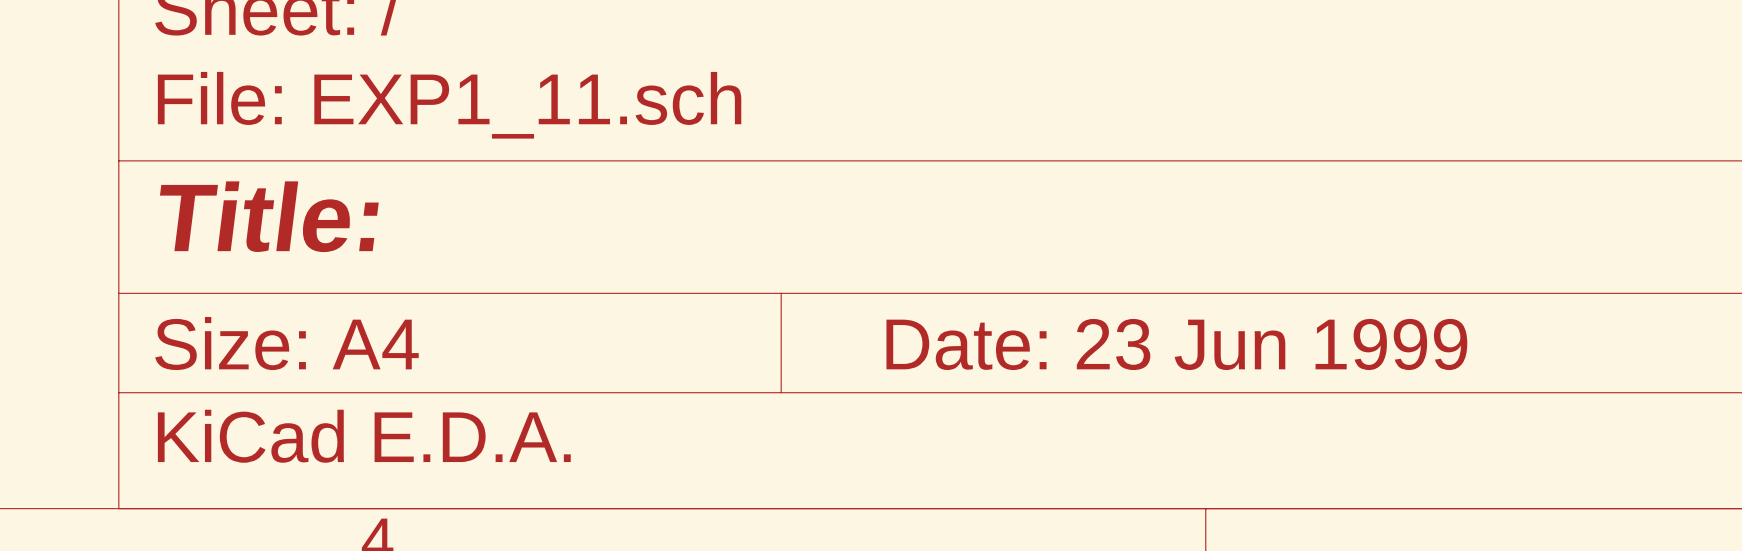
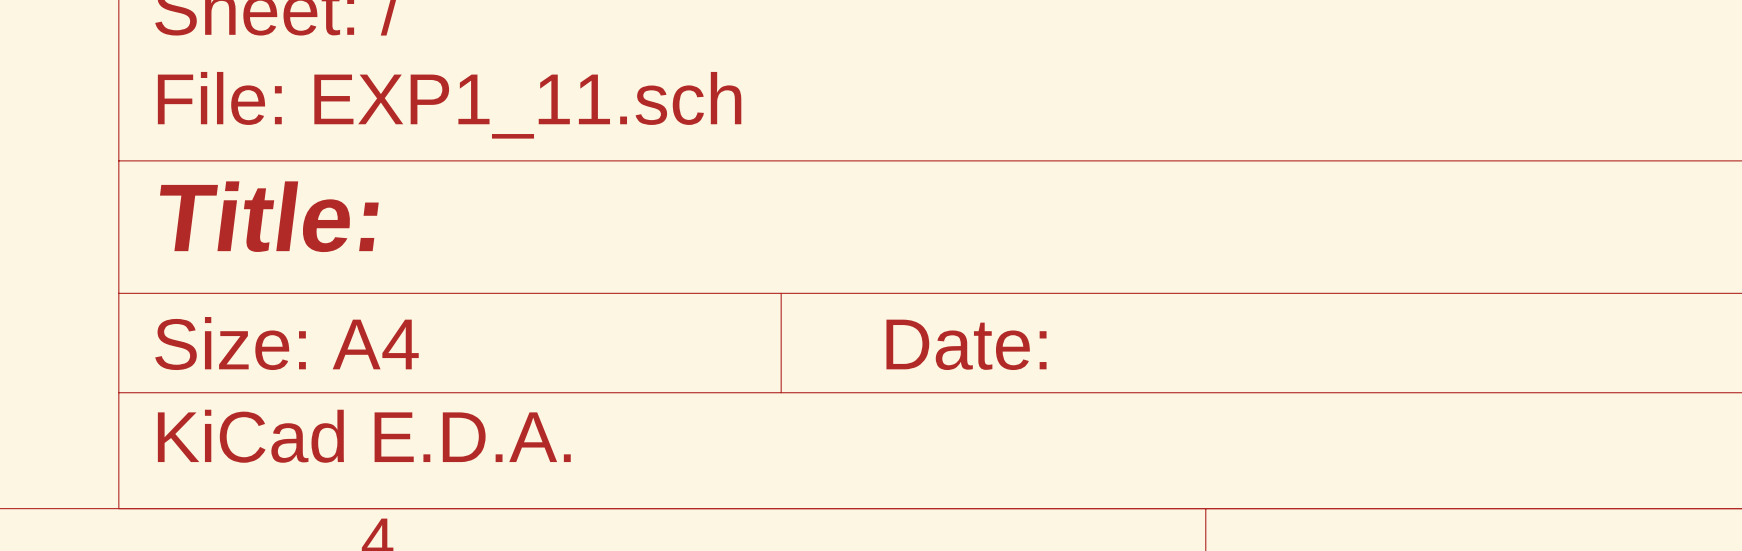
title block: Date: 23 Jun 1999 (1176, 344) -> Date: (966, 344)

